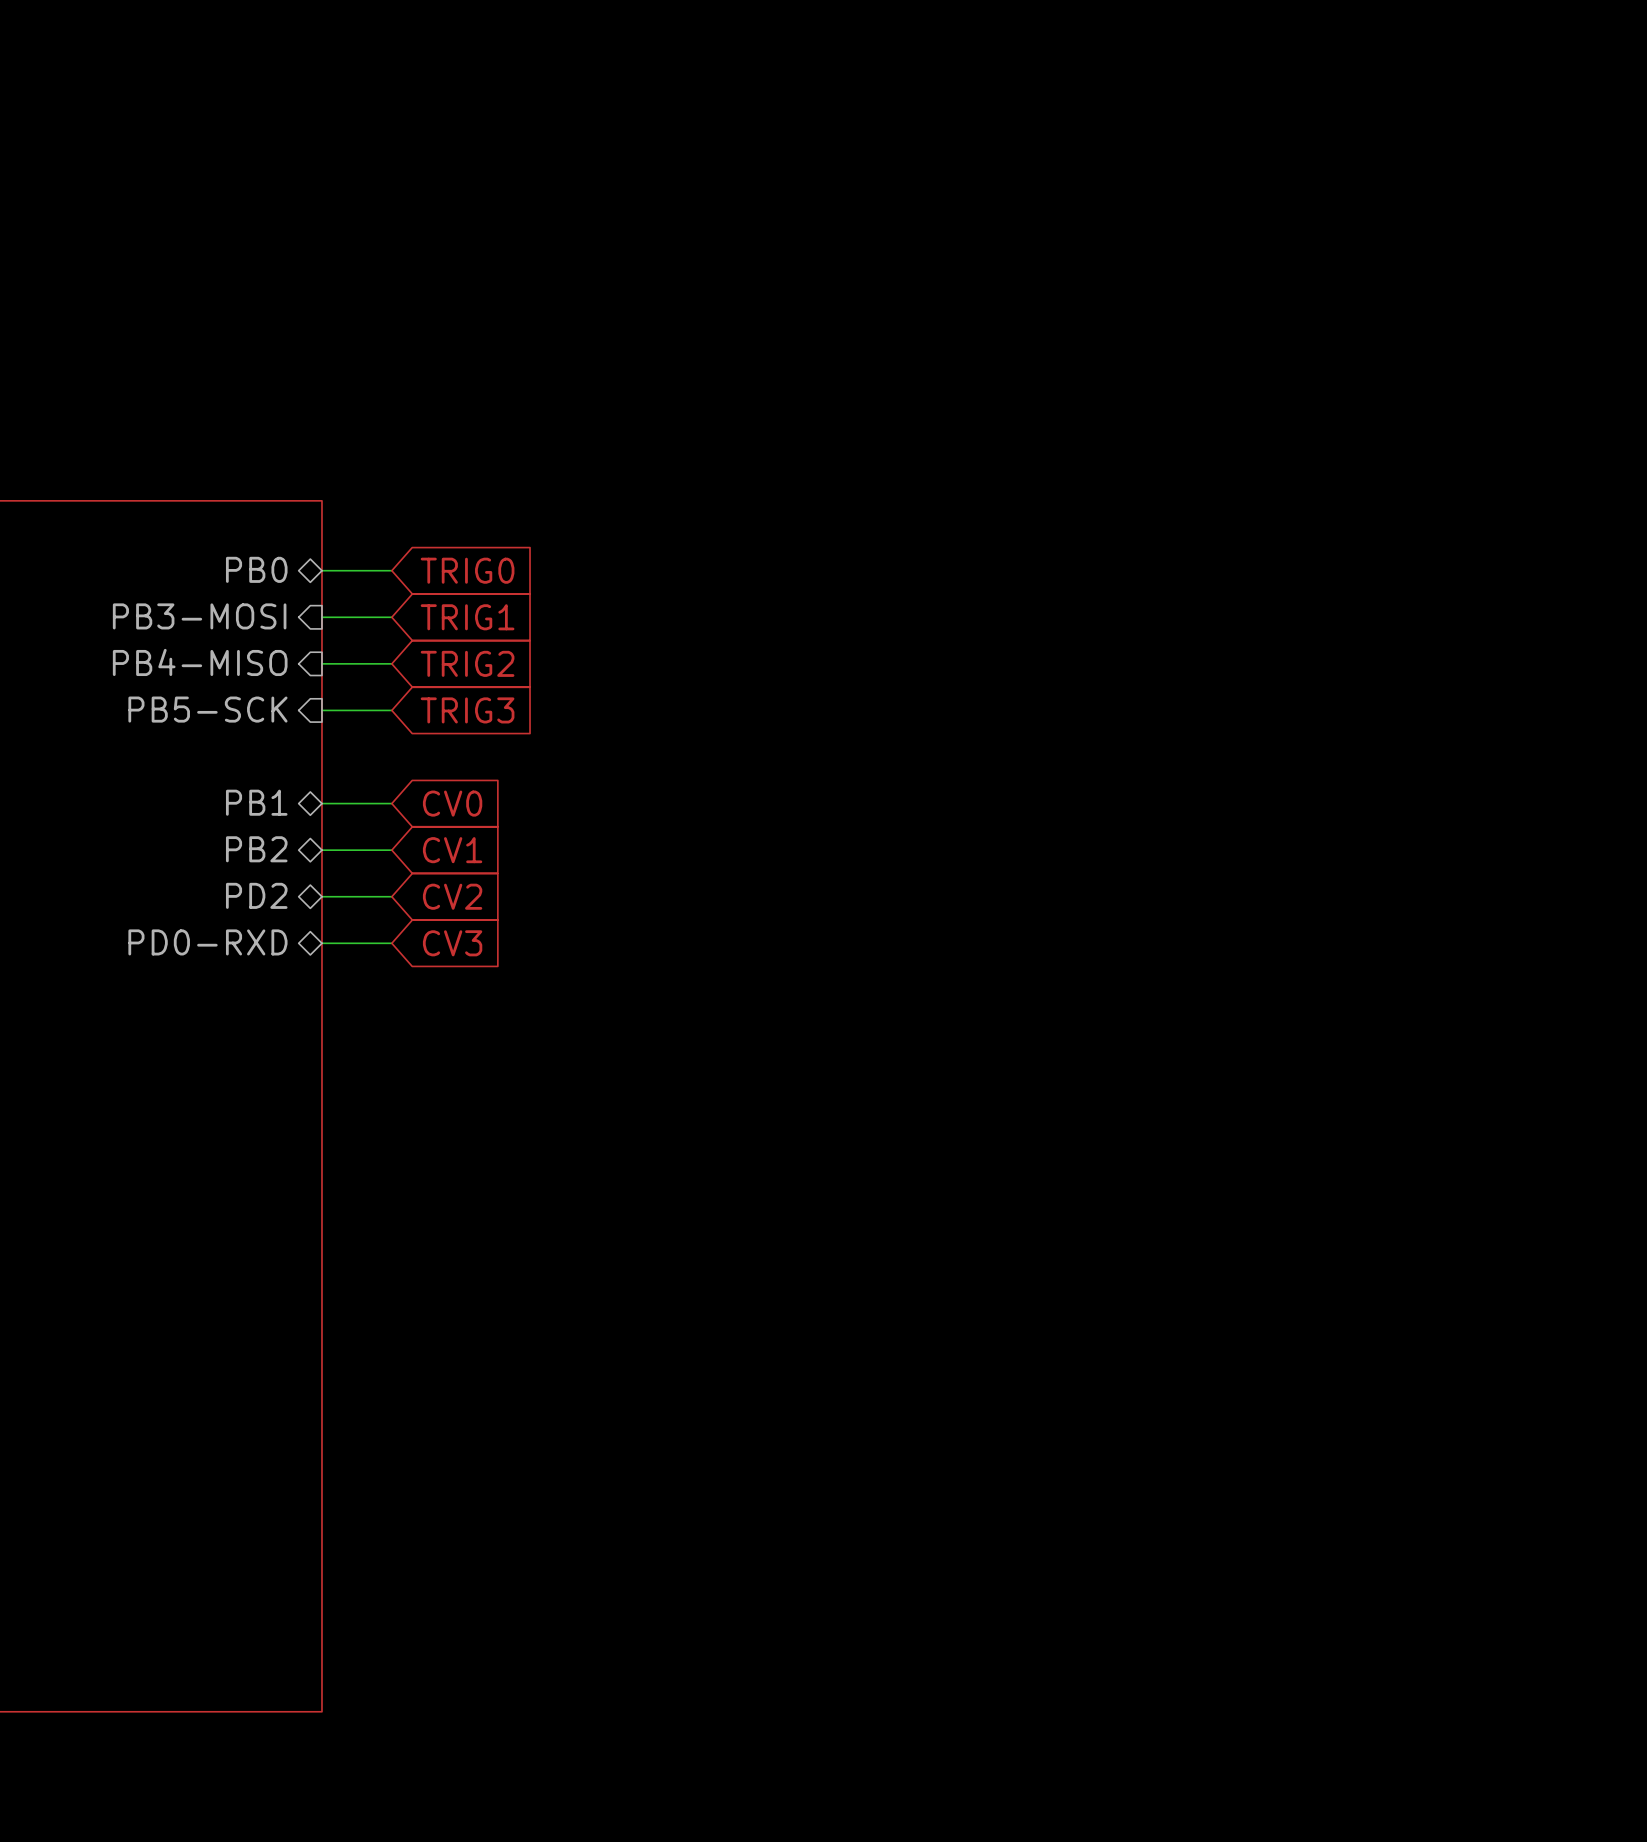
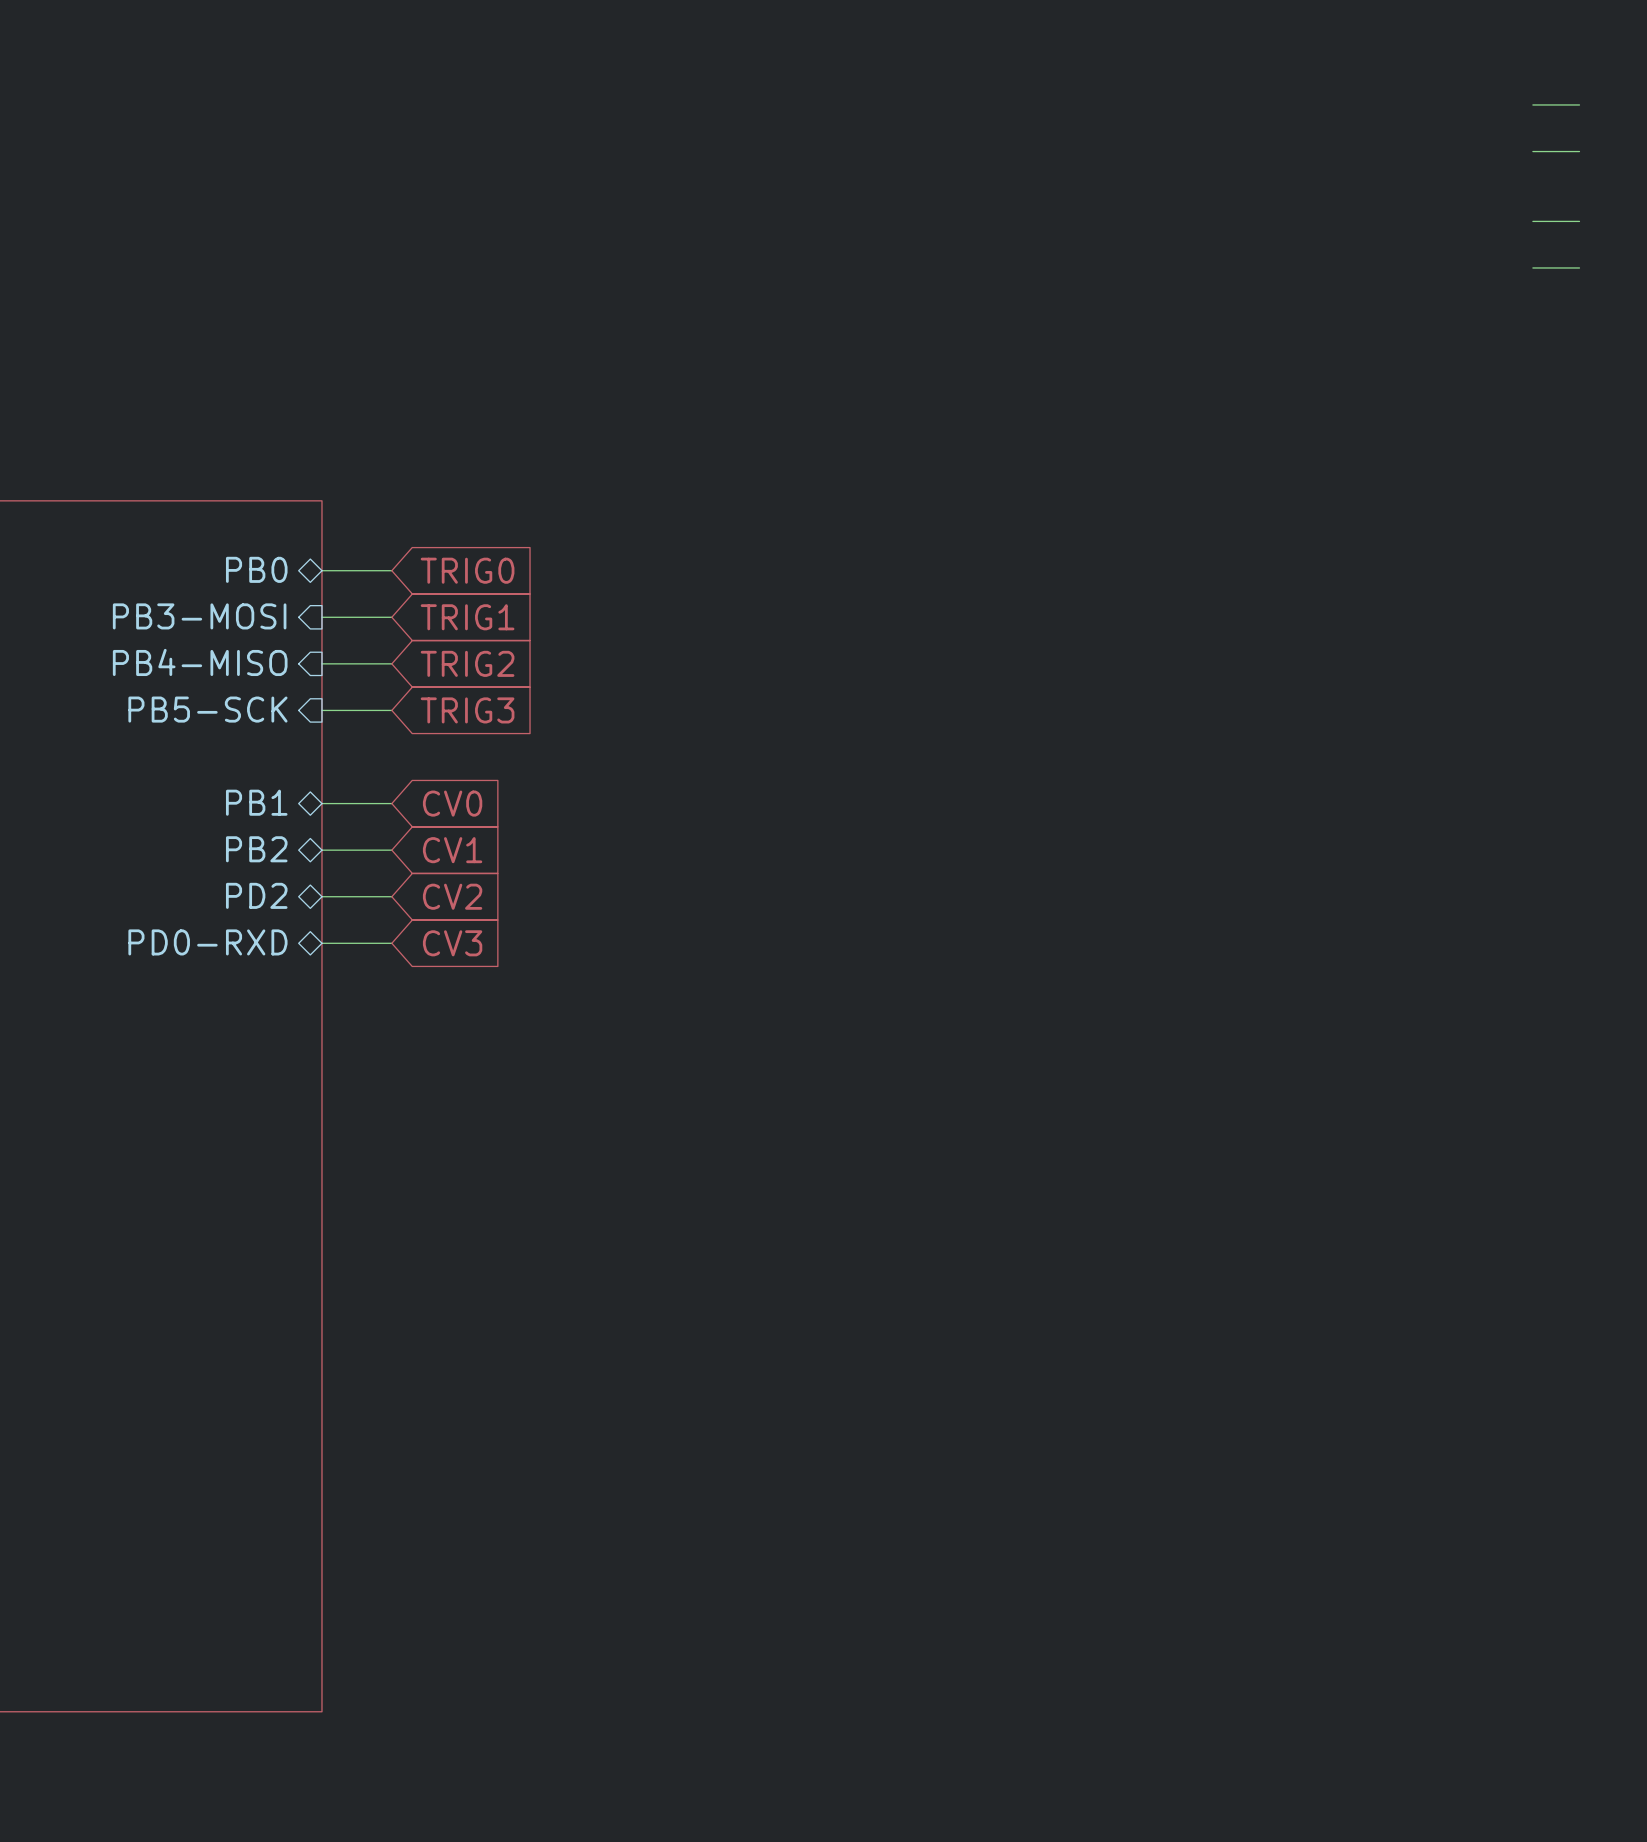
wire: none -> (1532, 104) (1579, 104)
wire: none -> (1532, 151) (1579, 151)
wire: none -> (1532, 221) (1579, 221)
wire: none -> (1532, 267) (1579, 267)

